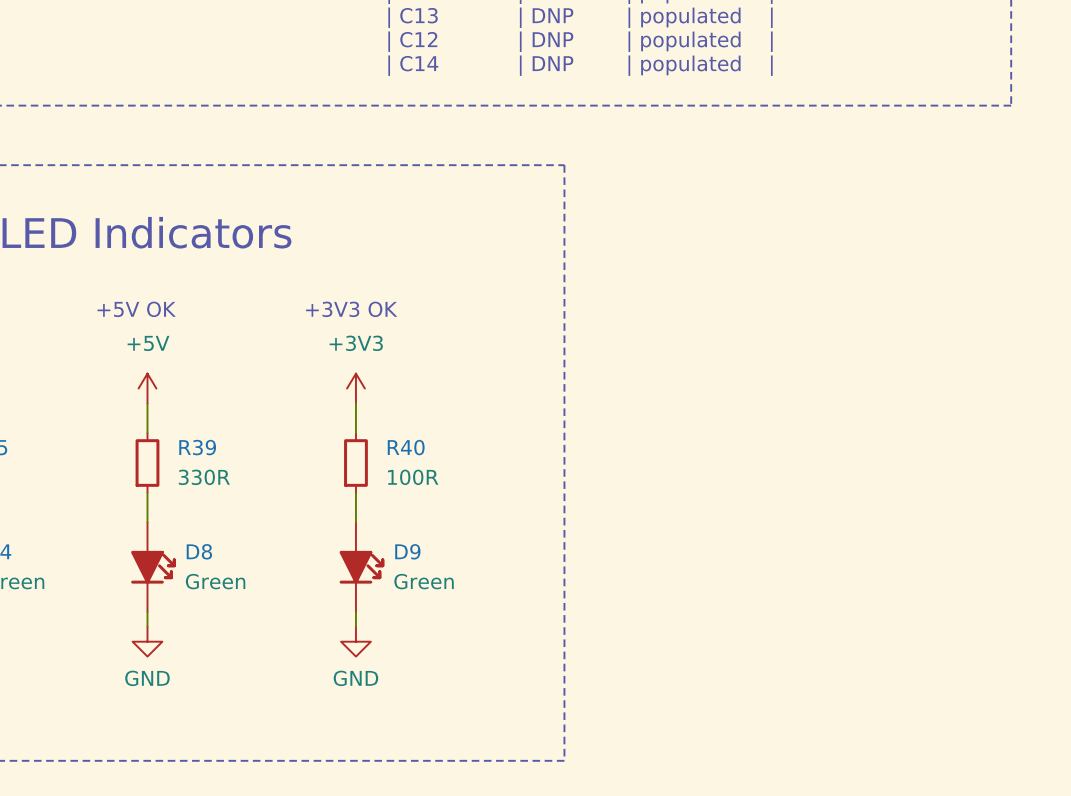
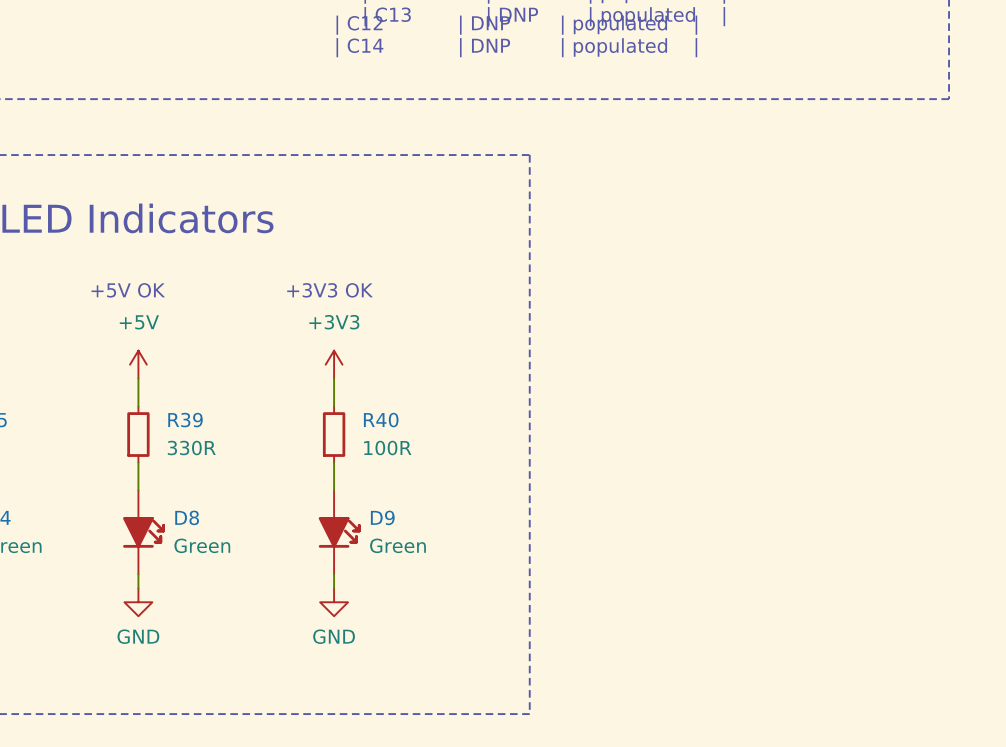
text position: | C12 | DNP | populated | (580, 41) -> | C12 | DNP | populated | (516, 25)
text position: | C14 | DNP | populated | (580, 65) -> | C14 | DNP | populated | (516, 47)

